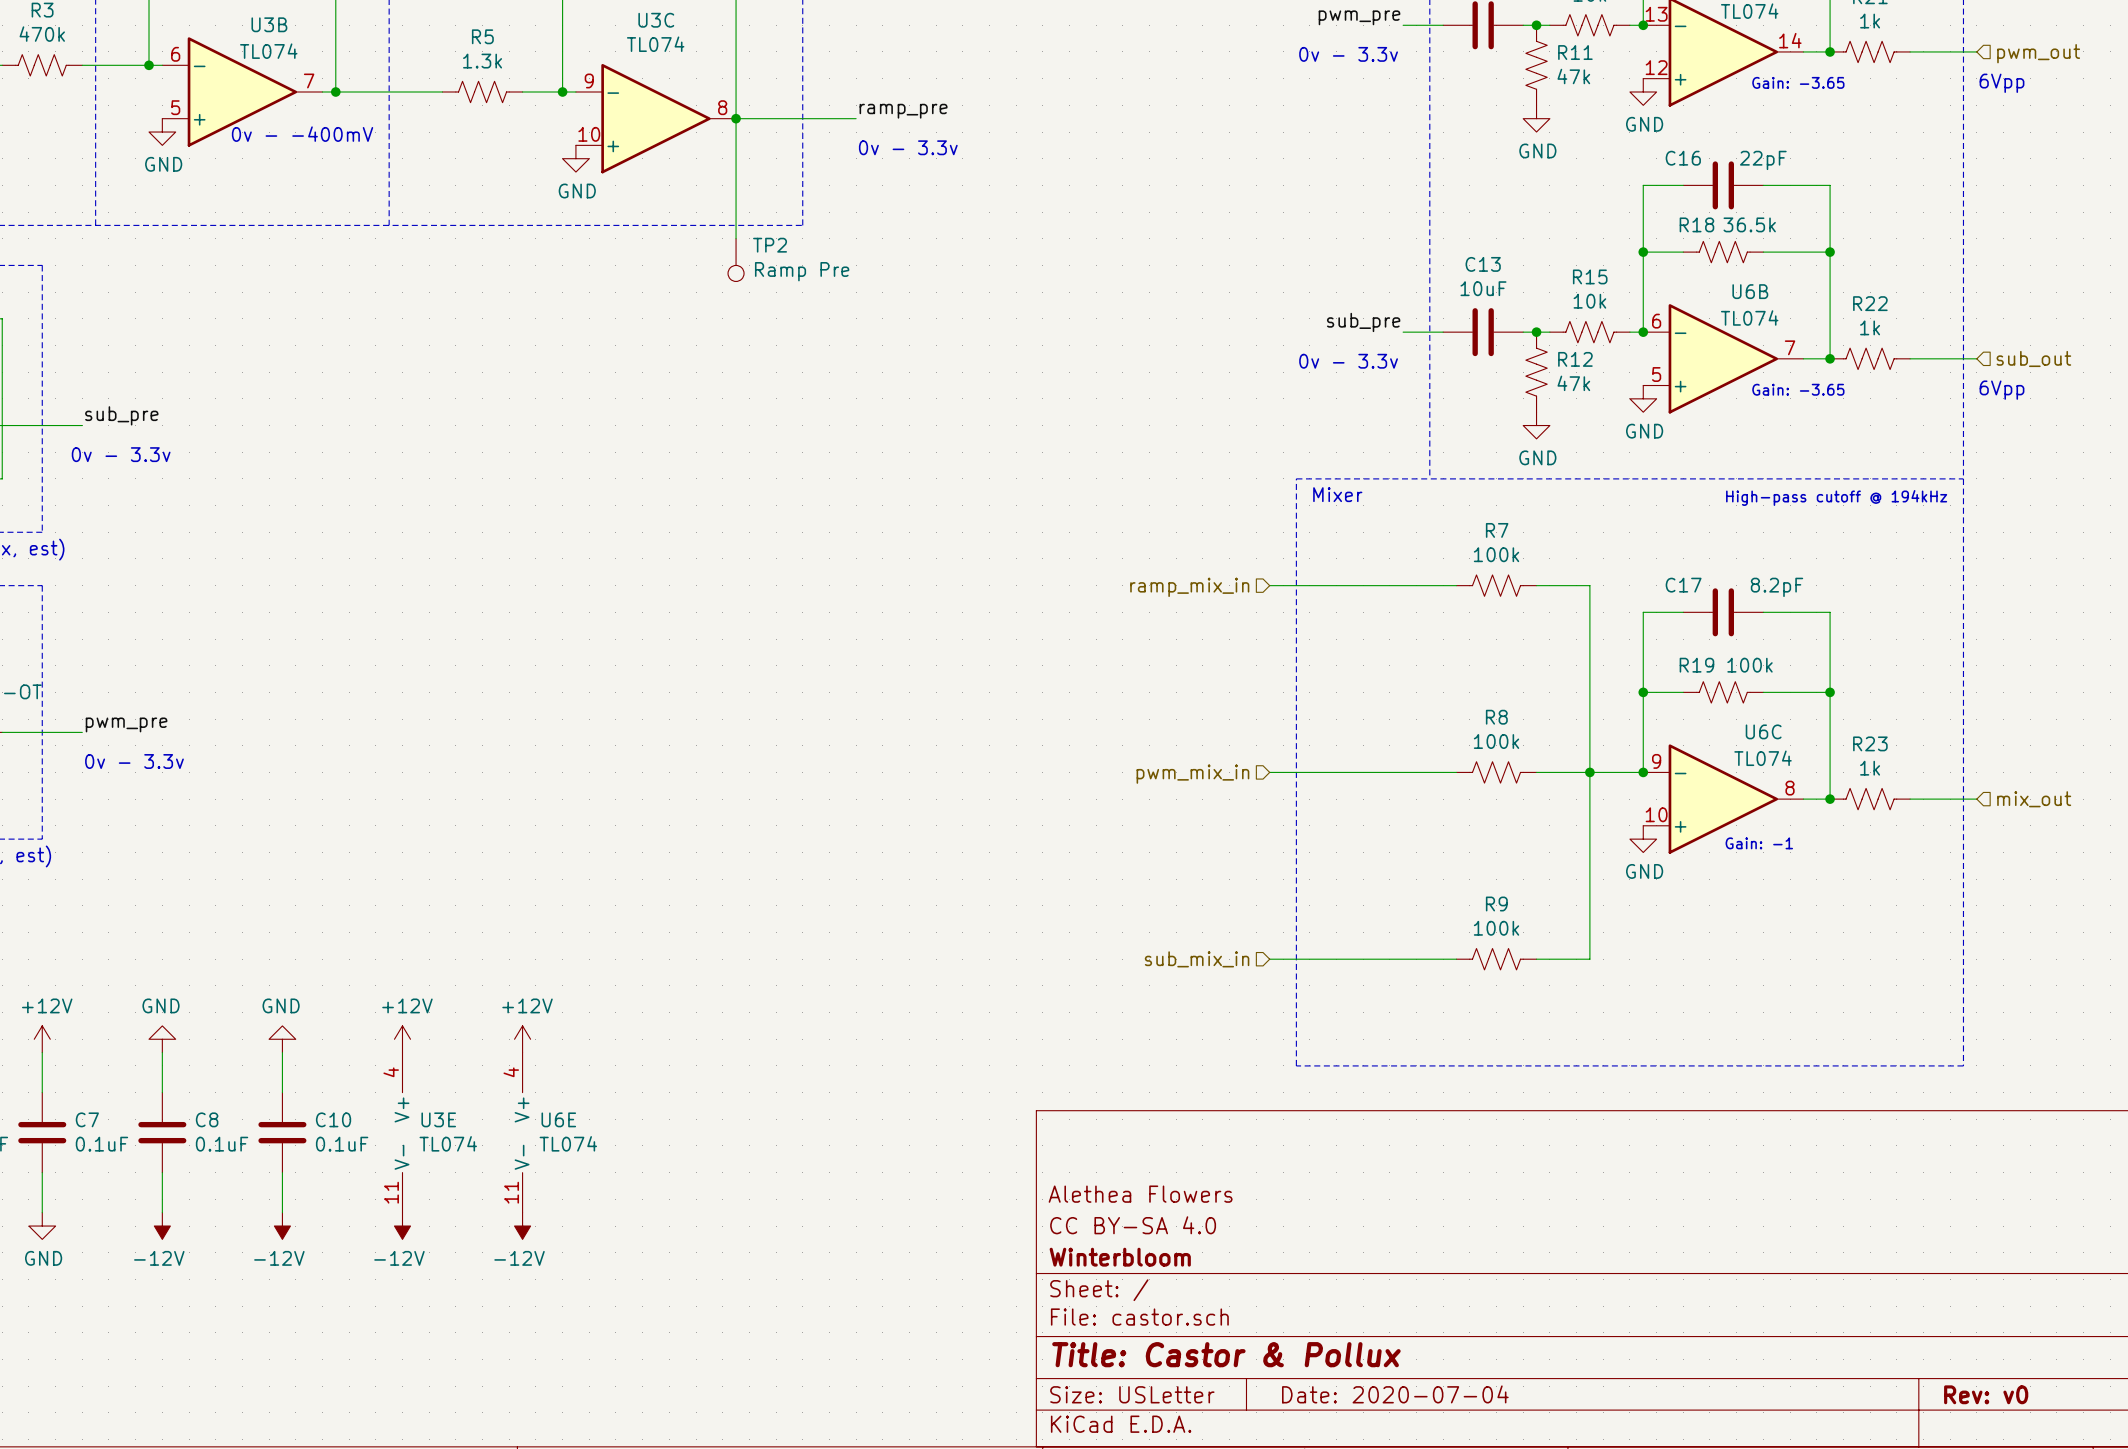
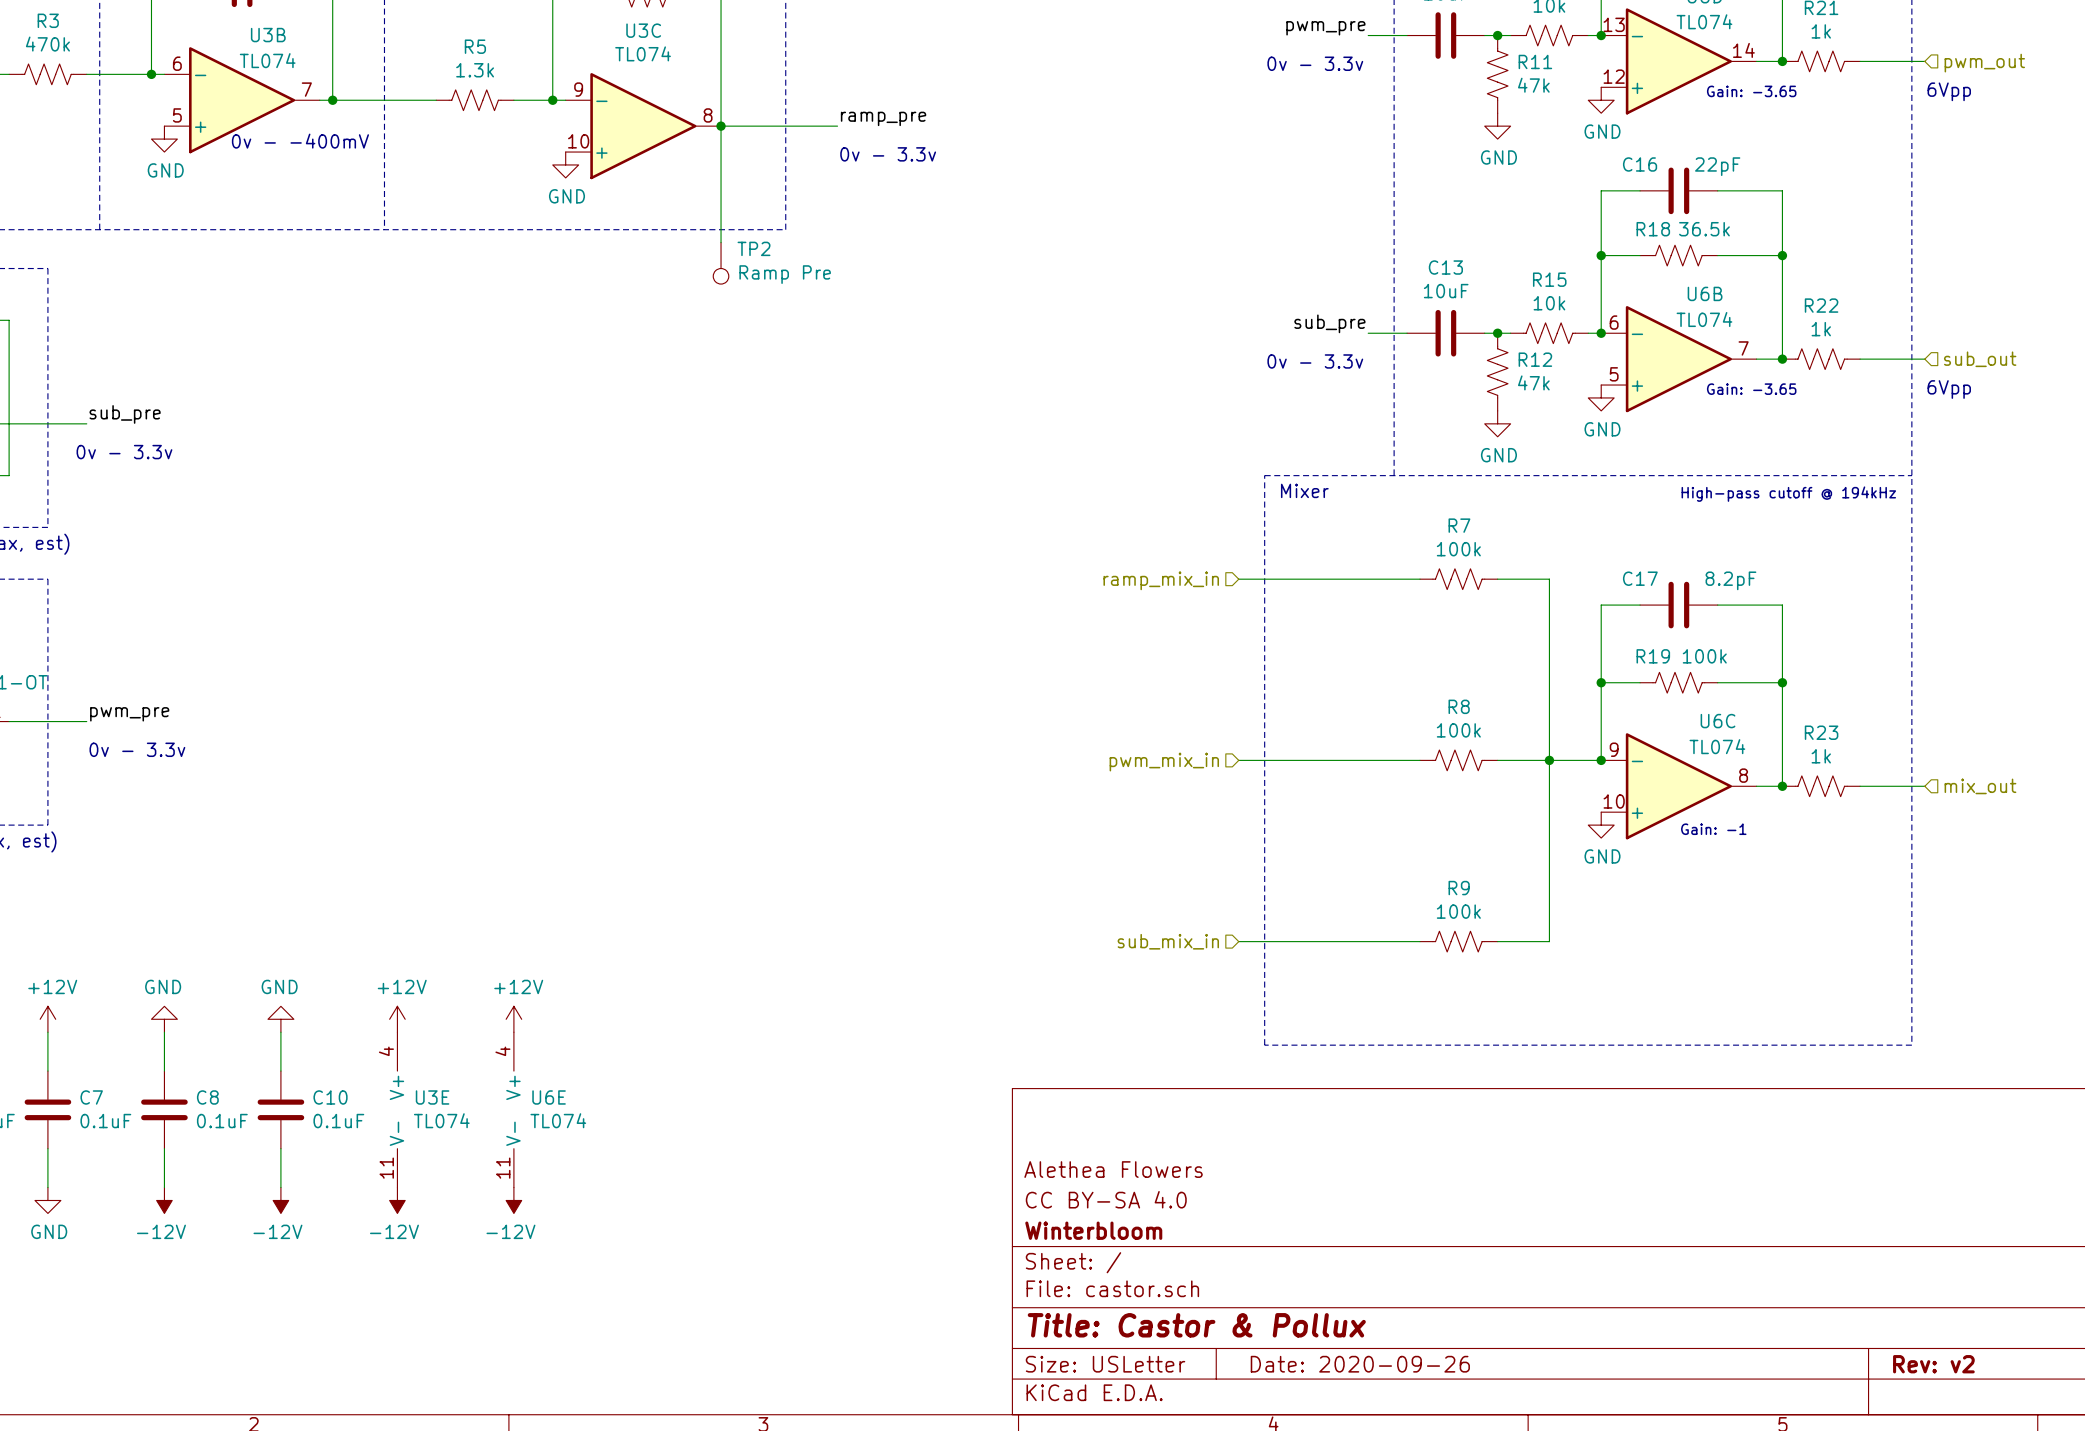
title block: Date: 2020-07-04 (1395, 1394) -> Date: 2020-09-26 (1360, 1364)
title block: Rev: v0 (1986, 1394) -> Rev: v2 (1933, 1364)

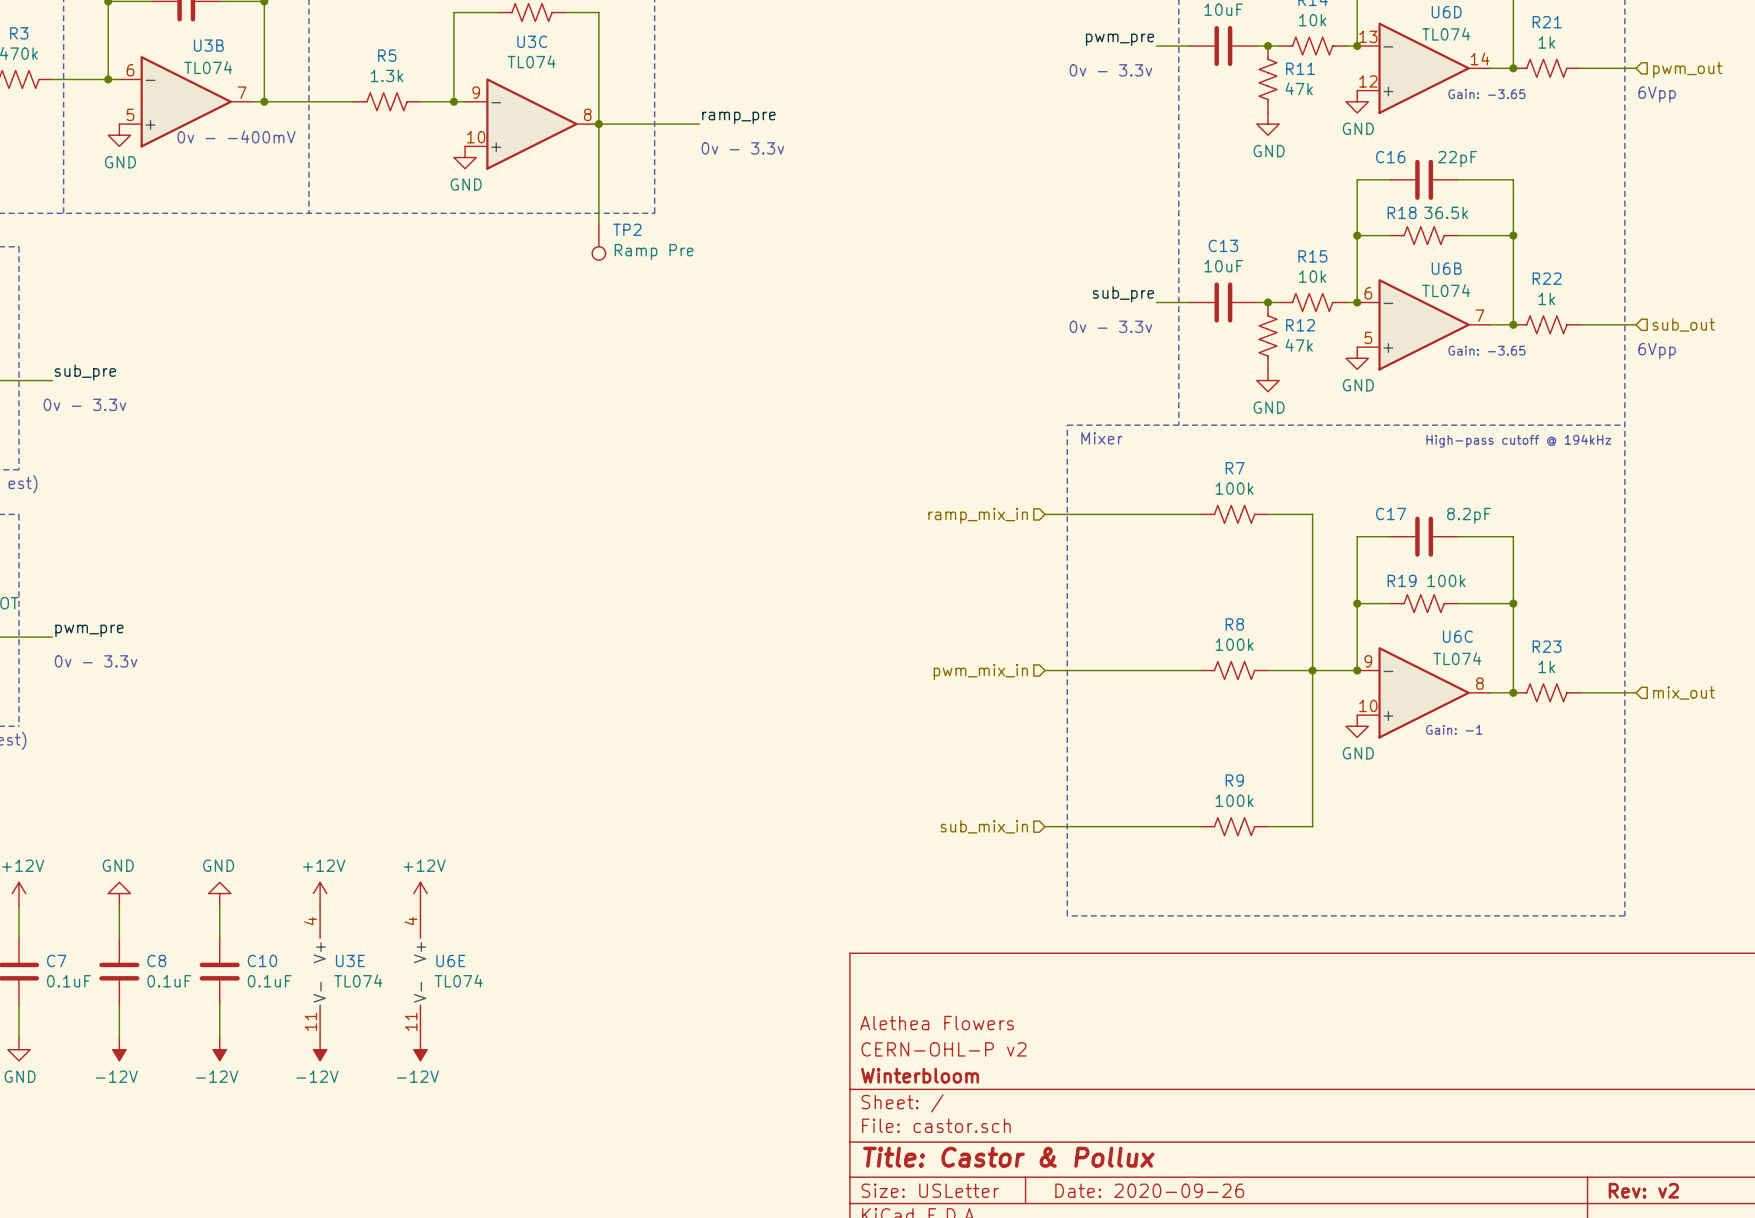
title block: CC BY-SA 4.0 (1106, 1199) -> CERN-OHL-P v2 (943, 1049)

